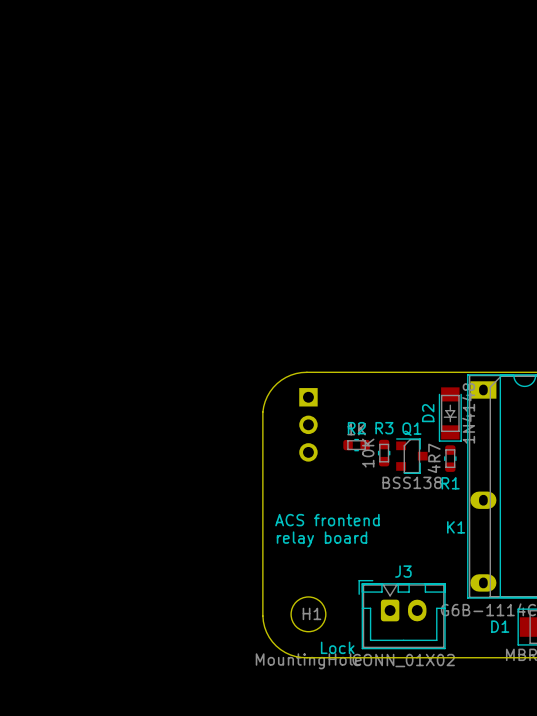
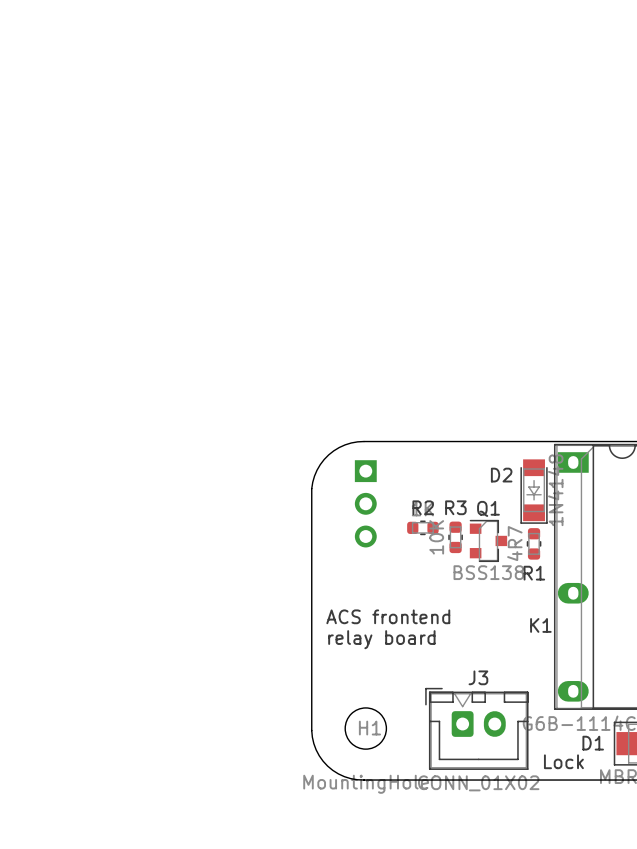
D2 name rotation: 0° (428, 413) -> 90° clockwise (501, 475)
text position: Lock (337, 647) -> Lock (563, 761)

